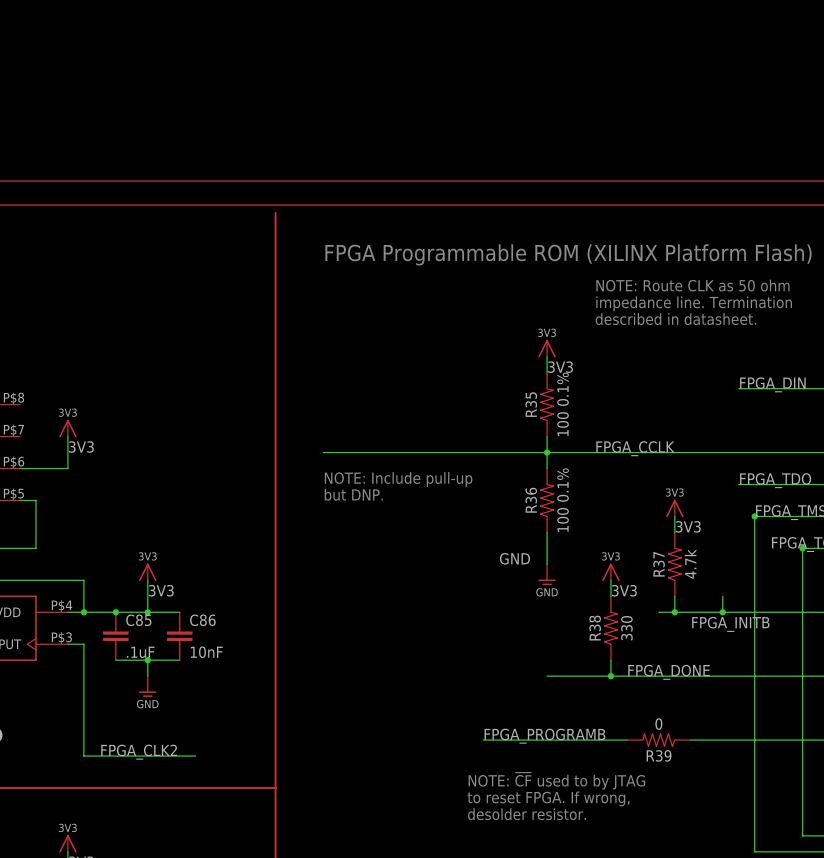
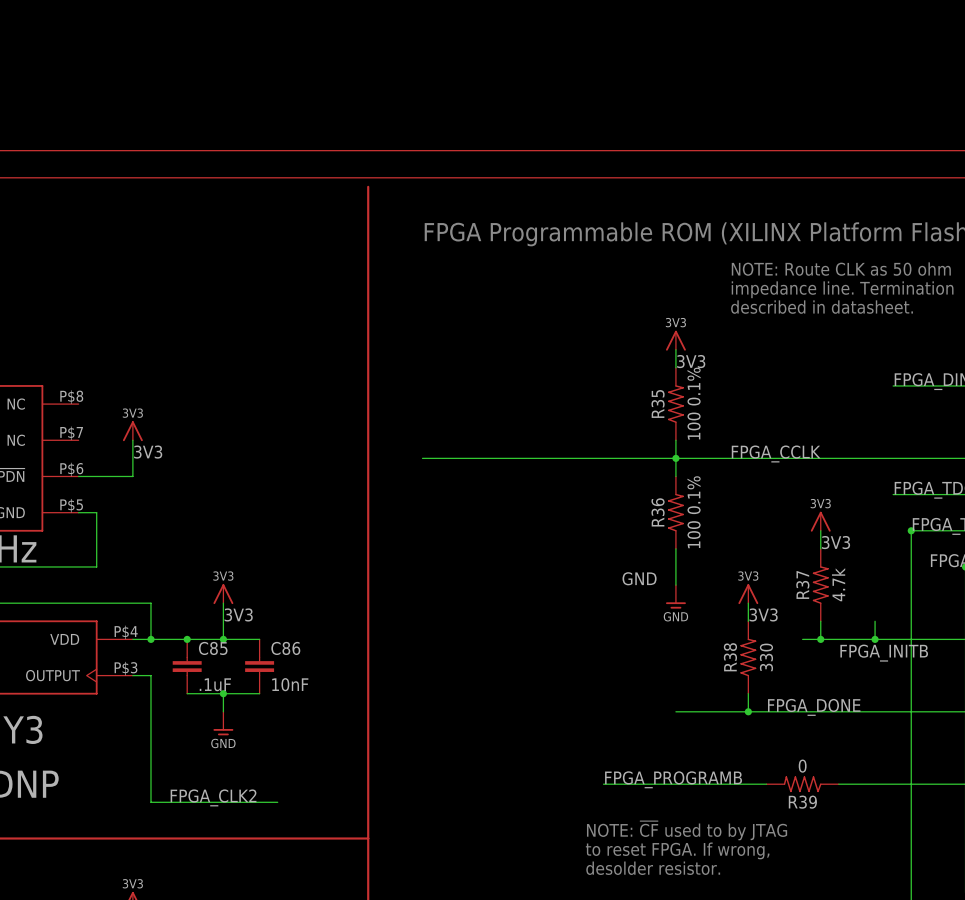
text: NOTE: Include pull-up (398, 479) -> none
text: but DNP. (353, 494) -> none

